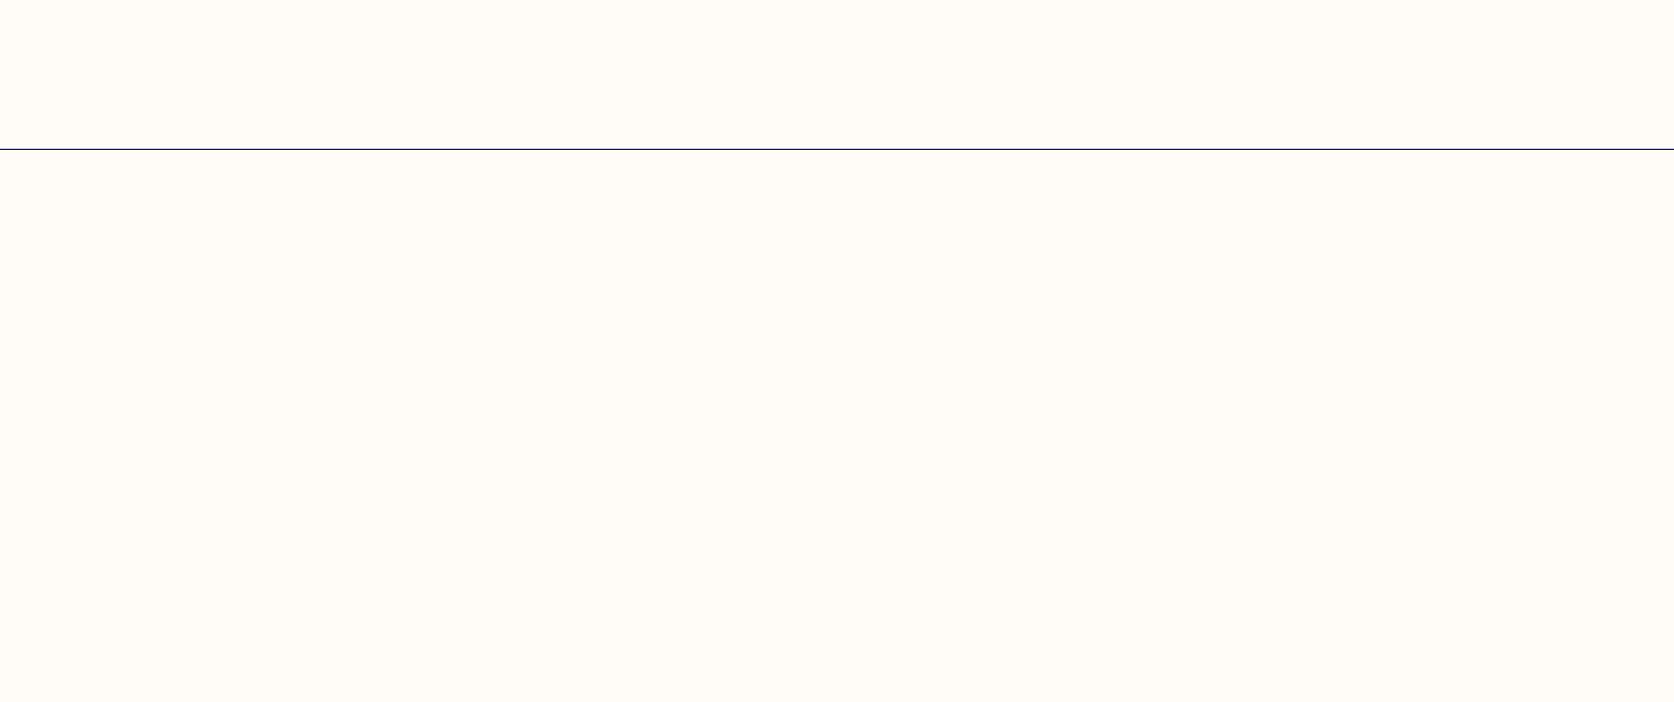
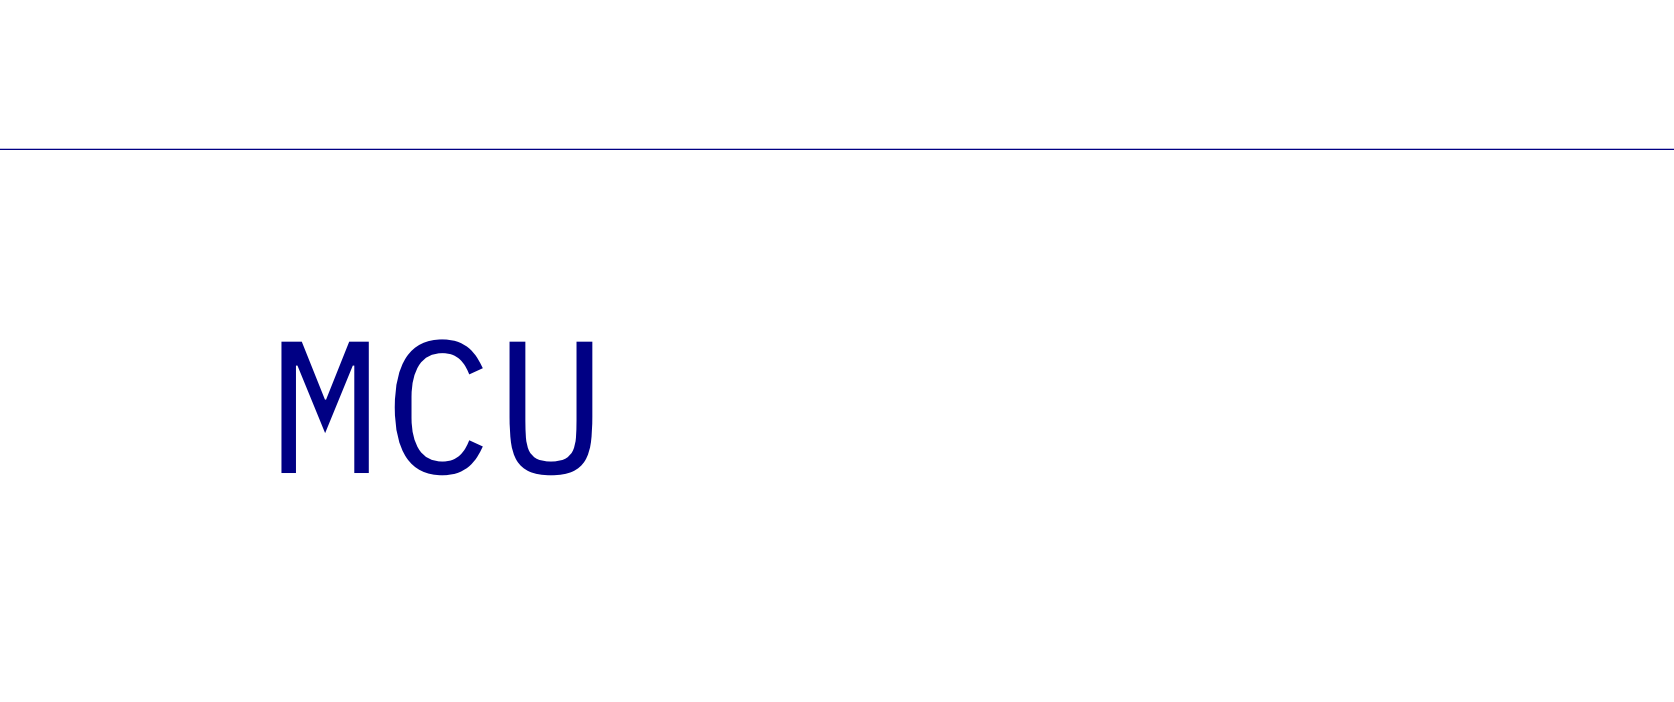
text: none -> MCU (436, 407)

